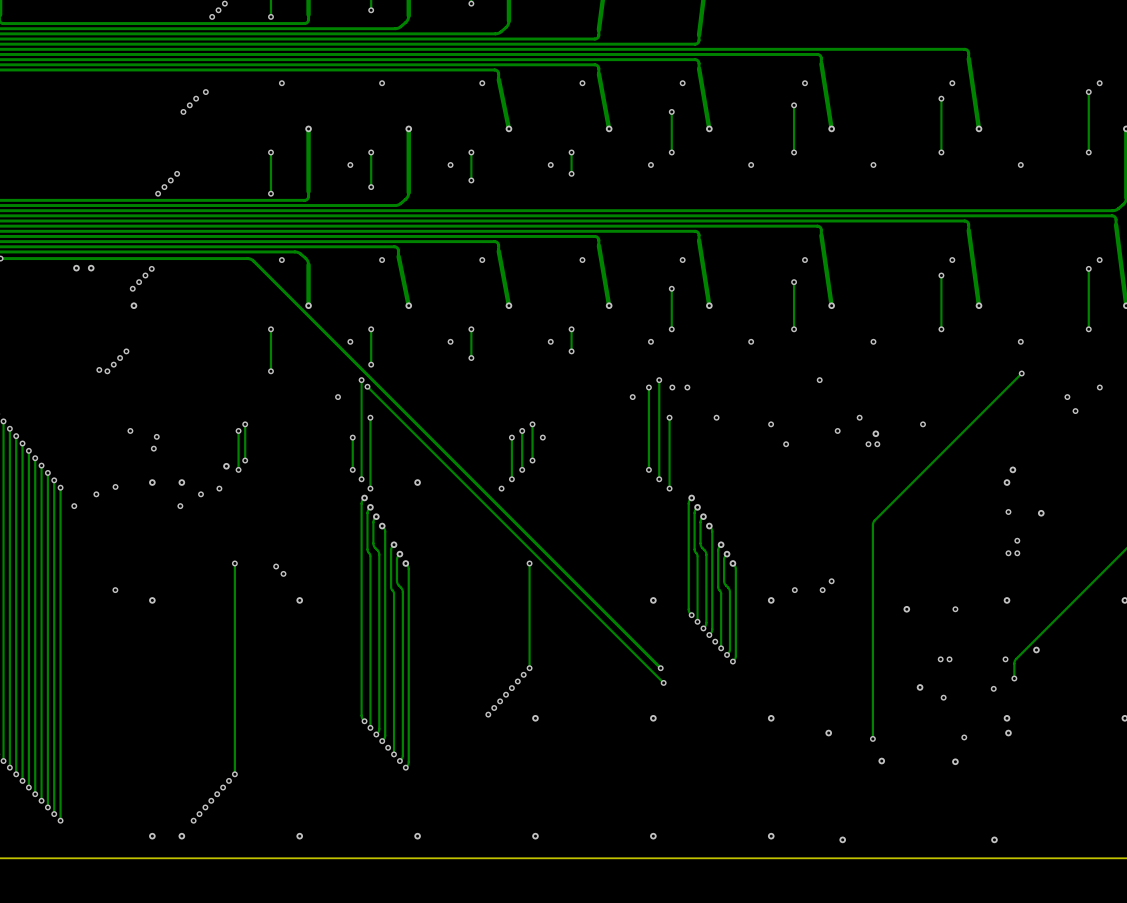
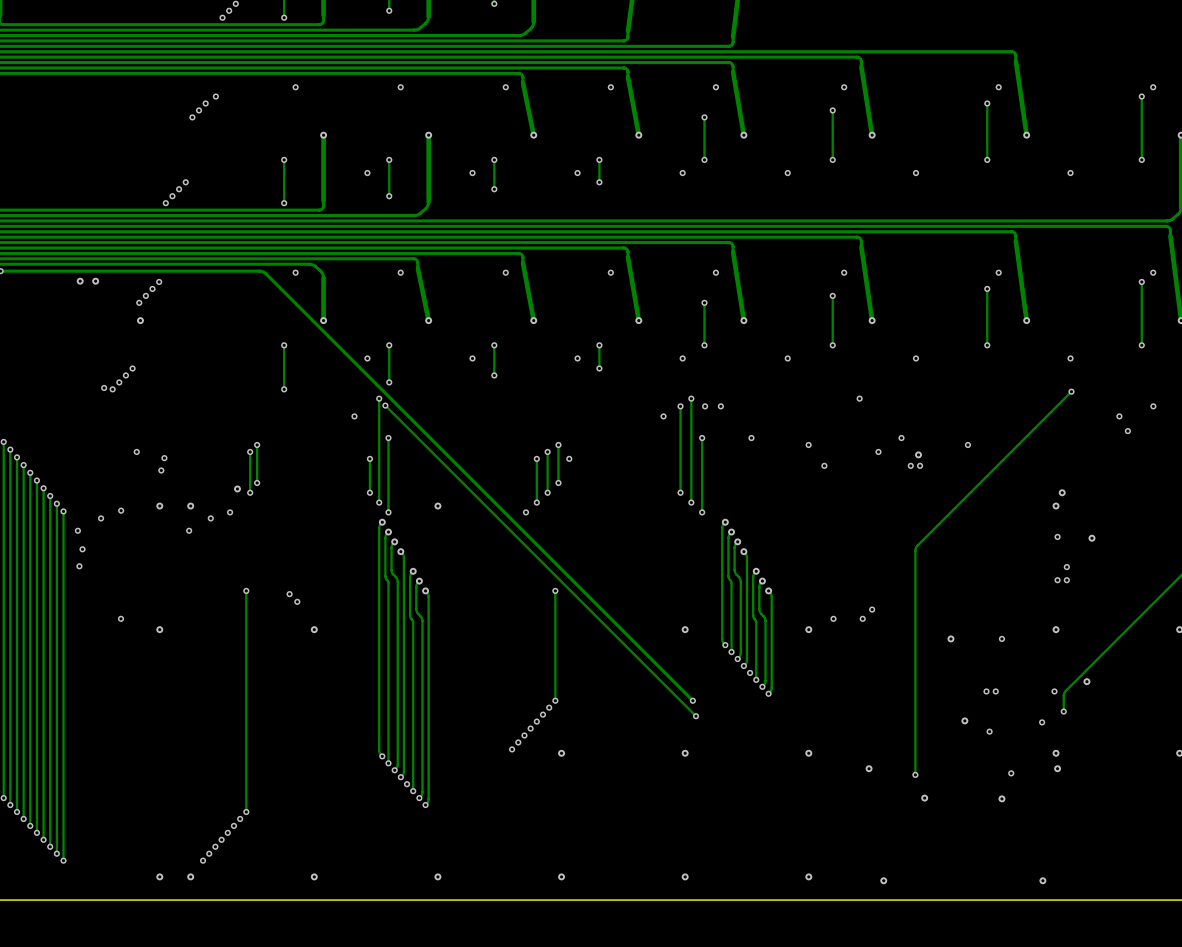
via: none -> (82, 549)
via: none -> (79, 566)

